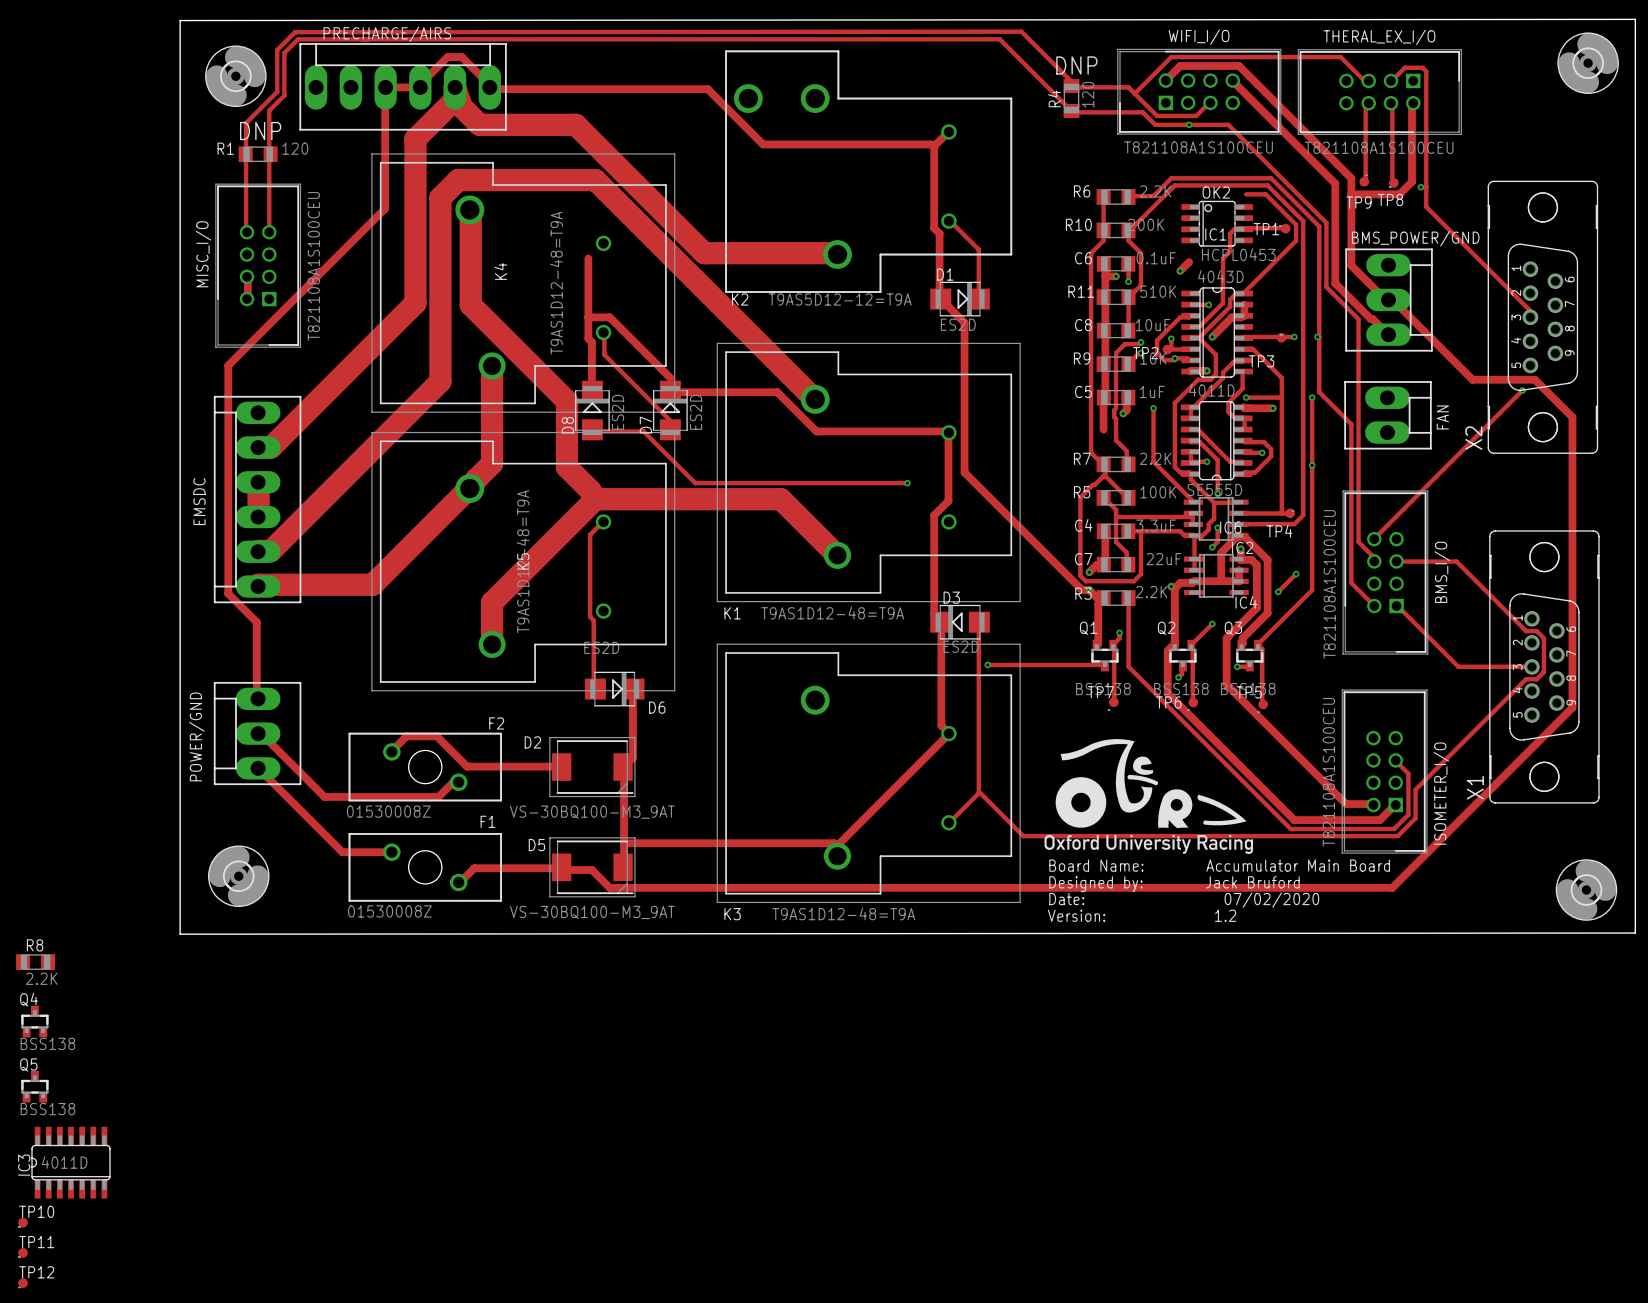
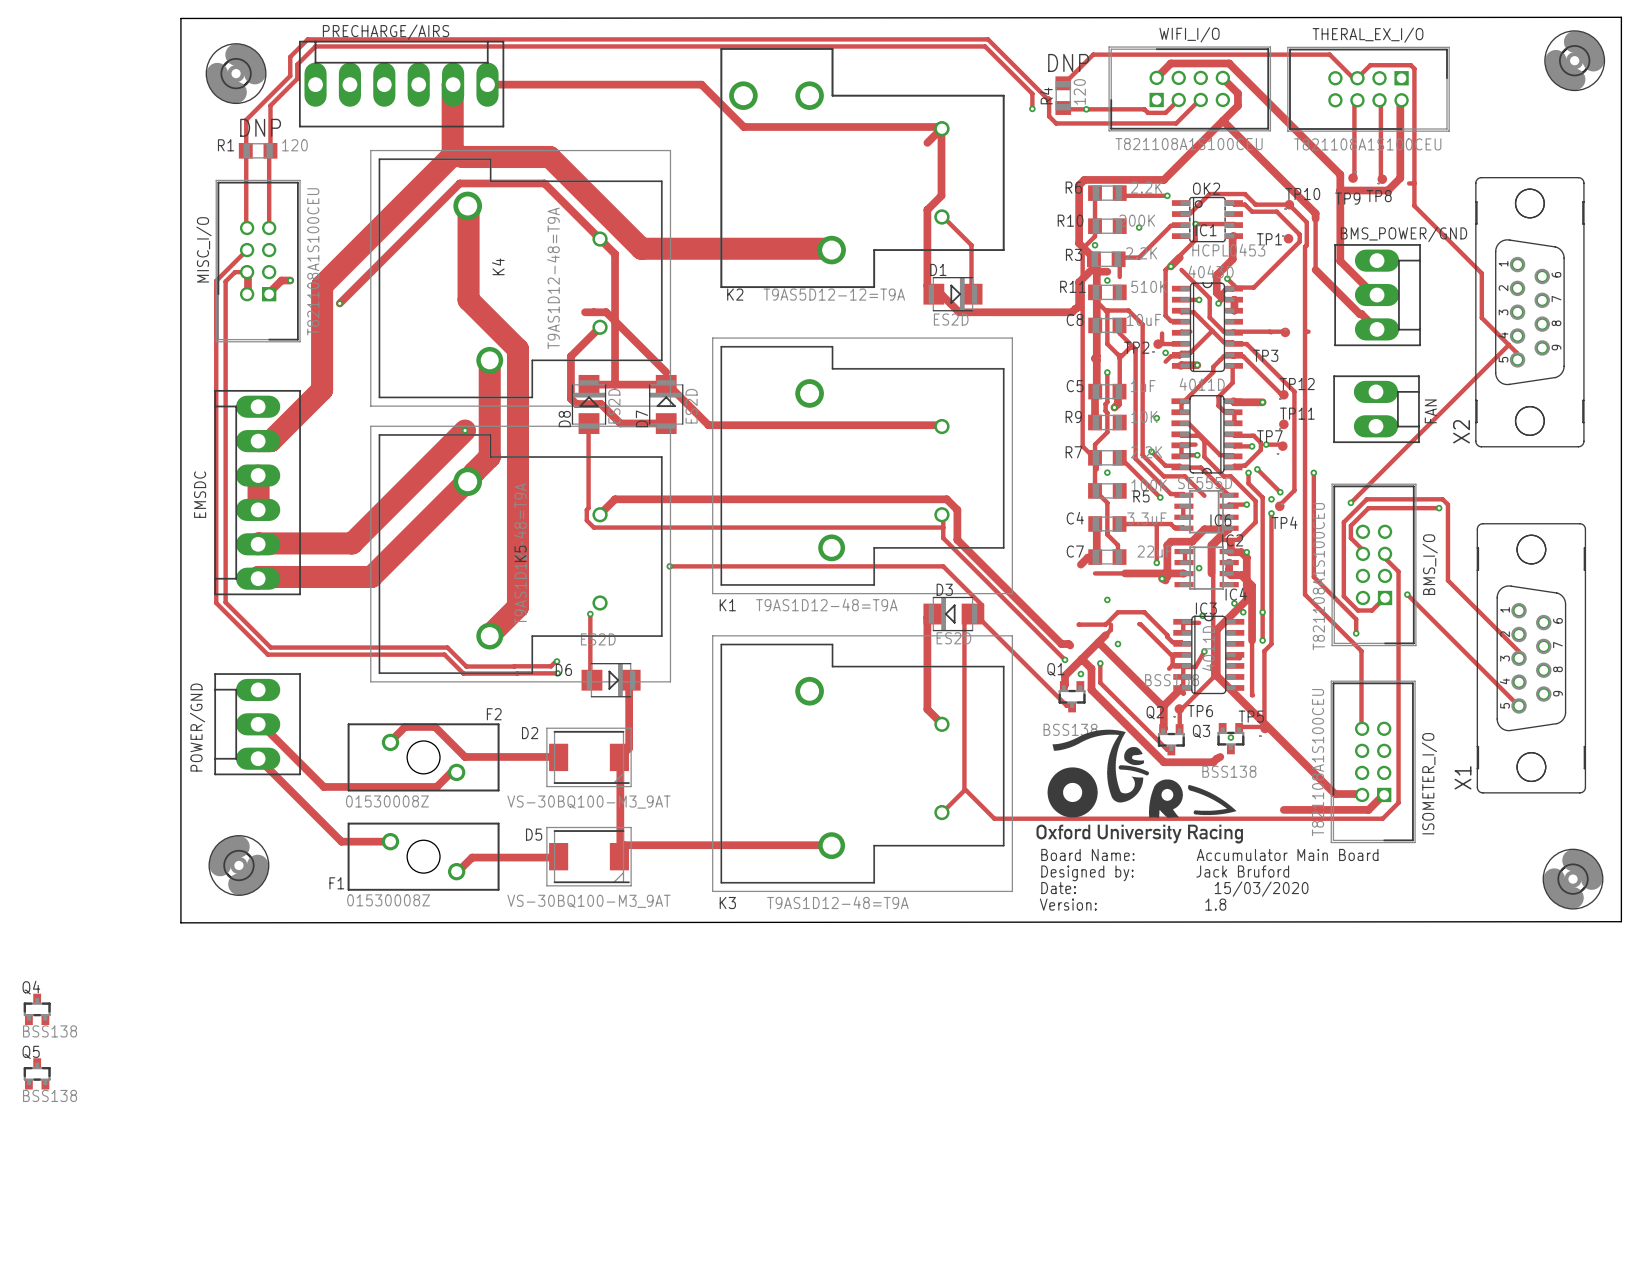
track: (295, 32) (277, 50) (277, 91) -> (1186, 112) (1176, 123) (1056, 123) (1049, 116) (1049, 98) (988, 39) (307, 39) (290, 56) (290, 75) (277, 89)
track: (295, 32) (1021, 31) (1069, 79) (1069, 85) (1071, 86) -> none
track: (362, 39) (999, 39) (1071, 111) (1069, 112) -> none
track: (368, 39) (298, 39) (284, 53) (284, 95) (269, 110) (269, 155) -> none
track: (1171, 57) (1134, 93) -> (1162, 54) (1093, 54) (1063, 83)
track: (1404, 67) (1390, 80) -> (1393, 65) (1370, 65) (1357, 78)
track: (455, 87) (461, 107) (479, 124) (575, 124) (704, 253) -> (452, 155) (463, 156) (549, 156) (641, 248) (699, 248)
track: (1071, 87) (1128, 87) (1153, 112) -> (1133, 109) (1144, 109)
track: (707, 89) (492, 89) (461, 57) (447, 57) (420, 83) (420, 87) (385, 87) (385, 208) (228, 365) (228, 593) (256, 622) (258, 698) -> (703, 86) (701, 84) (487, 84)
track: (1247, 96) (1335, 183) (1335, 283) -> (1315, 269) (1324, 278)
track: (454, 99) (415, 139) (415, 303) (322, 395) -> (452, 155) (322, 285) (322, 389)
track: none -> (452, 96) (452, 155)
track: none -> (1032, 108) (1032, 93) (985, 46) (315, 46) (297, 64) (297, 78) (270, 105) (270, 150)
via: none -> (1032, 108)
via: none -> (1086, 109)
track: (1142, 112) (1155, 124) (1228, 124) (1326, 222) -> (1222, 120) (1315, 213) (1315, 218)
track: (1174, 115) (1196, 115) -> (1165, 112) (1178, 99)
via: (1189, 124) -> none
track: (748, 130) (763, 144) (930, 144) (934, 146) (934, 213) -> (743, 126) (937, 126) (941, 128)
track: none -> (941, 128) (941, 195) (927, 209)
via: (1420, 187) -> none
track: (1246, 194) (1265, 194) (1287, 215) -> (1234, 203) (1234, 204) (1245, 204) (1252, 211) (1276, 211)
track: (1128, 196) (1153, 196) (1171, 178) (1271, 178) (1319, 226) (1319, 392) (1351, 424) (1351, 582) (1374, 606) -> none
track: none -> (1118, 194) (1167, 195)
via: none -> (1167, 195)
track: (1426, 206) (1529, 310) (1530, 317) -> (1414, 202) (1414, 205) (1481, 273) (1481, 317) (1516, 352) (1517, 359)
track: none -> (1180, 214) (1190, 213) (1209, 194) (1245, 194) (1255, 204) (1289, 204) (1306, 222) (1306, 245) (1305, 246) (1305, 594) (1361, 651) (1362, 728)
track: (1296, 224) (1296, 240) (1244, 292) -> (1285, 220) (1299, 234) (1299, 241) (1253, 287) (1234, 287) (1227, 278)
track: (934, 228) (939, 233) (939, 297) (964, 322) (964, 472) (1082, 590) (1089, 590) (1098, 599) (1103, 598) (1098, 604) (1098, 643) (1096, 645) -> (927, 224) (927, 285) (933, 294) (941, 294) (959, 312) (1072, 312) (1079, 306) (1079, 282) (1093, 268) (1093, 259) (1079, 243) (1079, 185) (1084, 179) (1163, 179) (1237, 105) (1237, 93)
via: none -> (1195, 224)
track: (1235, 228) (1230, 233) (1230, 251) (1223, 258) (1223, 303) (1199, 326) (1190, 326) -> (1225, 224) (1195, 224) (1195, 239) (1165, 269) (1165, 315) (1170, 321) (1180, 321)
track: (1246, 228) (1285, 228) -> none
TP1 position: (1285, 228) -> (1288, 238)
track: none -> (1180, 225) (1170, 225) (1139, 257) (1119, 257) (1118, 259)
via: none -> (1139, 227)
track: none -> (1234, 236) (1232, 259) (1216, 275) (1216, 292) (1222, 298)
via: none -> (1095, 245)
track: none -> (247, 250) (216, 280) (216, 603) (267, 654) (444, 654) (463, 673) (557, 673)
track: (588, 258) (588, 338) (591, 342) (592, 391) -> none
C6: 0.1uF (1116, 263) -> none
track: none -> (1181, 269) (1209, 298) (1209, 317) (1223, 331) (1234, 332)
track: (1326, 274) (1326, 287) (1358, 319) (1358, 541) (1362, 545) -> (1439, 508) (1368, 508) (1350, 525) (1350, 538)
track: none -> (247, 272) (235, 272) (225, 281) (225, 602) (270, 647) (447, 647) (466, 666) (551, 666) (557, 661)
via: (1116, 276) -> none
via: (1128, 281) -> none
via: none -> (1227, 278)
track: none -> (290, 280) (281, 280) (269, 294)
via: none -> (290, 280)
via: none -> (1107, 280)
track: none -> (1093, 292) (1095, 299) (1107, 312) (1107, 344) (1119, 355) (1119, 389)
track: (1388, 299) (1392, 299) (1472, 379) (1535, 379) (1572, 417) (1572, 707) (1392, 887) (609, 887) (591, 870) (565, 870) (561, 867) -> none
track: none -> (339, 303) (459, 183) (544, 183) (615, 254) (615, 384)
via: none -> (339, 303)
track: (1228, 308) (1199, 336) (1215, 354) (1215, 374) (1210, 379) (1198, 379) (1174, 402) (1174, 467) (1180, 472) -> (1151, 451) (1165, 465) (1170, 465)
via: none -> (1218, 303)
track: (1190, 315) (1180, 317) (1157, 340) (1157, 353) (1164, 360) (1187, 358) (1190, 360) -> (1180, 310) (1193, 312) (1223, 342) (1234, 343)
track: (1244, 315) (1231, 317) (1212, 336) -> none
track: none -> (1106, 311) (1128, 310) (1142, 324) (1142, 455) (1163, 476) (1185, 476)
track: (1128, 330) (1128, 297) (1141, 285) (1141, 253) (1128, 240) (1128, 230) (1174, 185) (1267, 185) (1303, 221) (1303, 515) (1294, 524) (1238, 524) -> none
track: (603, 332) (604, 354) (670, 420) (670, 429) -> (600, 327) (570, 356) (570, 398) (576, 404) (600, 404) (620, 423) (666, 423)
via: (1212, 336) -> none
track: none -> (1212, 330) (1190, 352) (1181, 352) (1179, 356) (1170, 356) (1165, 361)
via: (1294, 336) -> none
via: (1317, 336) -> none
TP3 position: (1281, 337) -> (1285, 332)
via: (1171, 338) -> none
track: (1141, 342) (1139, 344) (1124, 344) (1116, 353) (1116, 378) -> none
via: (1141, 342) -> none
track: (1253, 349) (1281, 377) (1281, 513) -> (1243, 344) (1246, 344) (1294, 391) (1294, 490) (1279, 506)
track: none -> (1508, 344) (1350, 502)
via: (1141, 353) -> none
track: (520, 354) (566, 401) (566, 467) (590, 490) (595, 499) -> none
track: none -> (1234, 354) (1243, 356) (1283, 394)
R9 position: (1116, 364) -> (1107, 422)
via: none -> (1107, 372)
track: (1522, 390) (1374, 539) -> none
via: (1522, 390) -> none
track: (673, 392) (777, 392) (816, 431) -> (589, 385) (666, 384) (708, 425) (810, 425)
track: (1246, 397) (1281, 397) -> none
via: (1246, 397) -> none
track: (1312, 397) (1312, 590) (1258, 643) (1262, 648) -> none
via: (1312, 397) -> none
track: (815, 399) (595, 180) (458, 180) (440, 197) (440, 381) (271, 550) -> (465, 430) (352, 543) (270, 543)
track: (1153, 408) (1153, 461) (1192, 500) -> (1119, 323) (1119, 333) (1135, 349) (1135, 458) (1170, 494) (1183, 494)
via position: (1153, 408) -> (1156, 418)
track: (592, 429) (593, 431) (643, 431) (695, 483) (907, 483) -> (589, 423) (586, 520) (593, 527) (943, 527)
track: (944, 431) (948, 432) (948, 500) (934, 515) (934, 613) (941, 622) (941, 725) -> (927, 617) (927, 709) (934, 716)
via: none -> (465, 430)
track: (1116, 438) (1126, 451) (1126, 463) (1128, 464) -> (1107, 432) (1095, 444) (1095, 489)
track: (1199, 442) (1217, 459) (1217, 493) -> (1190, 435) (1199, 435) (1204, 441) (1204, 456) (1223, 476) (1230, 476) (1255, 501) (1255, 522) (1237, 539) (1220, 539) (1213, 546) (1213, 677) (1181, 709) (1179, 708) (1179, 729)
track: none -> (1195, 444) (1180, 445)
track: none -> (1266, 444) (1282, 446)
via: none -> (1266, 444)
via: none -> (1151, 451)
track: none -> (1119, 455) (1160, 497)
via position: (1312, 465) -> (1313, 472)
track: (1190, 474) (1190, 479) (1194, 483) -> (1181, 467) (1200, 467) (1229, 495)
track: none -> (1257, 469) (1280, 492)
via: none -> (1257, 469)
via: none -> (1107, 472)
track: none -> (1248, 472) (1248, 483) (1262, 497) (1262, 640)
via: none -> (1248, 472)
track: none -> (1313, 472) (1313, 576) (1356, 619) (1356, 633)
via: (907, 483) -> none
R5 name position: R5 (1082, 492) -> R5 (1141, 496)
via: (1217, 493) -> none
track: (1128, 497) (1105, 476) (1080, 497) (1080, 575) (1085, 581) (1103, 581) -> none
track: (595, 499) (492, 602) (492, 643) -> (517, 349) (517, 606) (489, 635)
track: (595, 499) (780, 499) (837, 555) -> none
via: none -> (1280, 492)
track: (1238, 502) (1214, 502) (1214, 518) (1208, 524) (1208, 529) (1201, 536) (1193, 535) (1193, 559) -> none
via: none -> (1160, 497)
via: none -> (1271, 499)
via: none -> (1350, 502)
via: none -> (1246, 504)
track: (1238, 513) (1288, 513) -> (1229, 506) (1229, 504) (1246, 504)
via: none -> (1439, 508)
track: (1116, 517) (1192, 517) -> none
track: none -> (1271, 513) (1271, 644) (1264, 651) (1265, 728) (1239, 728)
via: none -> (1271, 513)
track: (603, 521) (590, 534) (590, 616) (593, 622) -> (600, 514) (615, 499) (946, 499) (957, 509) (957, 539) (1061, 644) (1070, 645)
track: none -> (941, 514) (943, 538) (1065, 659)
track: (1217, 527) (1217, 541) (1212, 547) -> none
via: (1217, 527) -> none
track: (1141, 531) (1141, 574) (1133, 581) -> (1184, 573) (1125, 573)
track: none -> (1156, 524) (1156, 562)
TP4 name position: TP4 (1279, 531) -> TP4 (1284, 522)
track: (1238, 535) (1244, 536) (1267, 559) (1267, 613) (1242, 638) (1241, 645) -> (1229, 528) (1204, 529) (1192, 541) (1170, 541) (1167, 545) (1167, 576)
via: (1212, 547) -> none
via: (1240, 549) -> none
via: none -> (1246, 552)
track: (1397, 561) (1456, 561) (1526, 631) (1536, 631) (1543, 638) (1543, 672) (1536, 679) (1526, 679) (1415, 789) (1415, 818) (1397, 836) (1023, 836) (978, 793) -> none
via: none -> (1156, 562)
via: (1089, 572) -> none
track: none -> (669, 566) (943, 566) (982, 605) (982, 621) (1066, 705) (1072, 707)
via: none -> (669, 566)
track: (1296, 574) (1278, 591) -> none
via: (1296, 574) -> none
via: none -> (1199, 568)
track: (1239, 577) (1239, 581) (1180, 582) (1174, 588) (1174, 643) (1167, 650) (1167, 693) (1294, 820) -> (1229, 569) (1230, 575) (1241, 575) (1252, 585) (1252, 640)
via: (1089, 590) -> none
via: (1278, 591) -> none
R3 position: (1116, 598) -> (1106, 259)
track: (1128, 599) (1128, 666) (1290, 829) -> (965, 617) (964, 790) (994, 818) (1280, 818)
track: none -> (1407, 594) (1519, 705)
via: none -> (1407, 594)
track: (1396, 606) (1458, 666) (1531, 666) -> (1385, 597) (1372, 610) (1357, 610) (1343, 596) (1343, 522) (1366, 499) (1442, 499) (1447, 504) (1447, 580) (1518, 651) (1518, 658)
via: none -> (1107, 599)
via: none -> (1234, 603)
via: none -> (1243, 612)
via: none -> (1262, 612)
via: none -> (590, 614)
track: (979, 622) (978, 793) -> none
track: (1212, 624) (1191, 645) (1192, 675) -> (1204, 651) (1195, 666) (1182, 665) (1183, 666)
Q3 name position: Q3 (1233, 628) -> Q3 (1201, 731)
track: none -> (1199, 622) (1182, 621) (1182, 632)
track: none -> (1078, 624) (1105, 624) (1117, 612) (1144, 612) (1172, 642) (1182, 643)
via: (1119, 632) -> none
track: none -> (1139, 624) (1170, 654) (1182, 654)
via: none -> (1356, 633)
track: (1114, 643) (1113, 702) -> (1105, 635) (1065, 675) (1063, 686)
via: none -> (1262, 640)
track: none -> (1098, 642) (1163, 705)
via: none -> (1117, 644)
Q1 position: (1104, 655) -> (1072, 696)
Q2 position: (1182, 655) -> (1171, 739)
Q3 position: (1249, 655) -> (1230, 738)
via: none -> (1204, 651)
track: (987, 665) (1104, 666) -> none
via: (987, 665) -> none
via: (1237, 666) -> none
track: none -> (1081, 659) (1091, 668) (1091, 689) (1163, 762) (1213, 762) (1220, 756)
via: none -> (1065, 659)
via: none -> (557, 661)
track: none -> (1100, 663) (1100, 682) (1167, 749) (1171, 750)
via: none -> (1100, 663)
via: (1178, 677) -> none
via: none -> (557, 673)
via: none -> (1080, 674)
track: none -> (1182, 687) (1163, 705)
TP7 position: (1113, 702) -> (1282, 446)
TP6 name position: TP6 (1168, 702) -> TP6 (1200, 711)
TP6 position: (1193, 702) -> (1179, 708)
TP5 position: (1263, 704) -> (1265, 728)
D6 name position: D6 (657, 707) -> D6 (563, 669)
track: none -> (1163, 705) (1163, 729)
track: (948, 733) (837, 845) (837, 856) (834, 843) (624, 843) -> none
via: none -> (1230, 737)
track: (1395, 760) (1408, 773) (1408, 814) -> (1386, 554) (1386, 559) (1398, 571) (1398, 802) (1396, 804)
track: (978, 793) (971, 800) -> none
F1 name position: F1 (488, 821) -> F1 (336, 883)
track: none -> (831, 845) (623, 845) (619, 856)
text: Date: 07/02/2020 (1184, 900) -> Date: 15/03/2020 (1174, 889)
text: Version: 1.2 (1142, 915) -> Version: 1.8 (1133, 904)
R8: 2.2K (35, 962) -> none
IC3 rotation: 0° (71, 1162) -> 90° clockwise (1208, 654)
IC3 position: (71, 1162) -> (1208, 654)
TP10 position: (23, 1222) -> (1289, 204)
TP11 position: (23, 1252) -> (1283, 424)
TP12 position: (23, 1283) -> (1283, 394)

